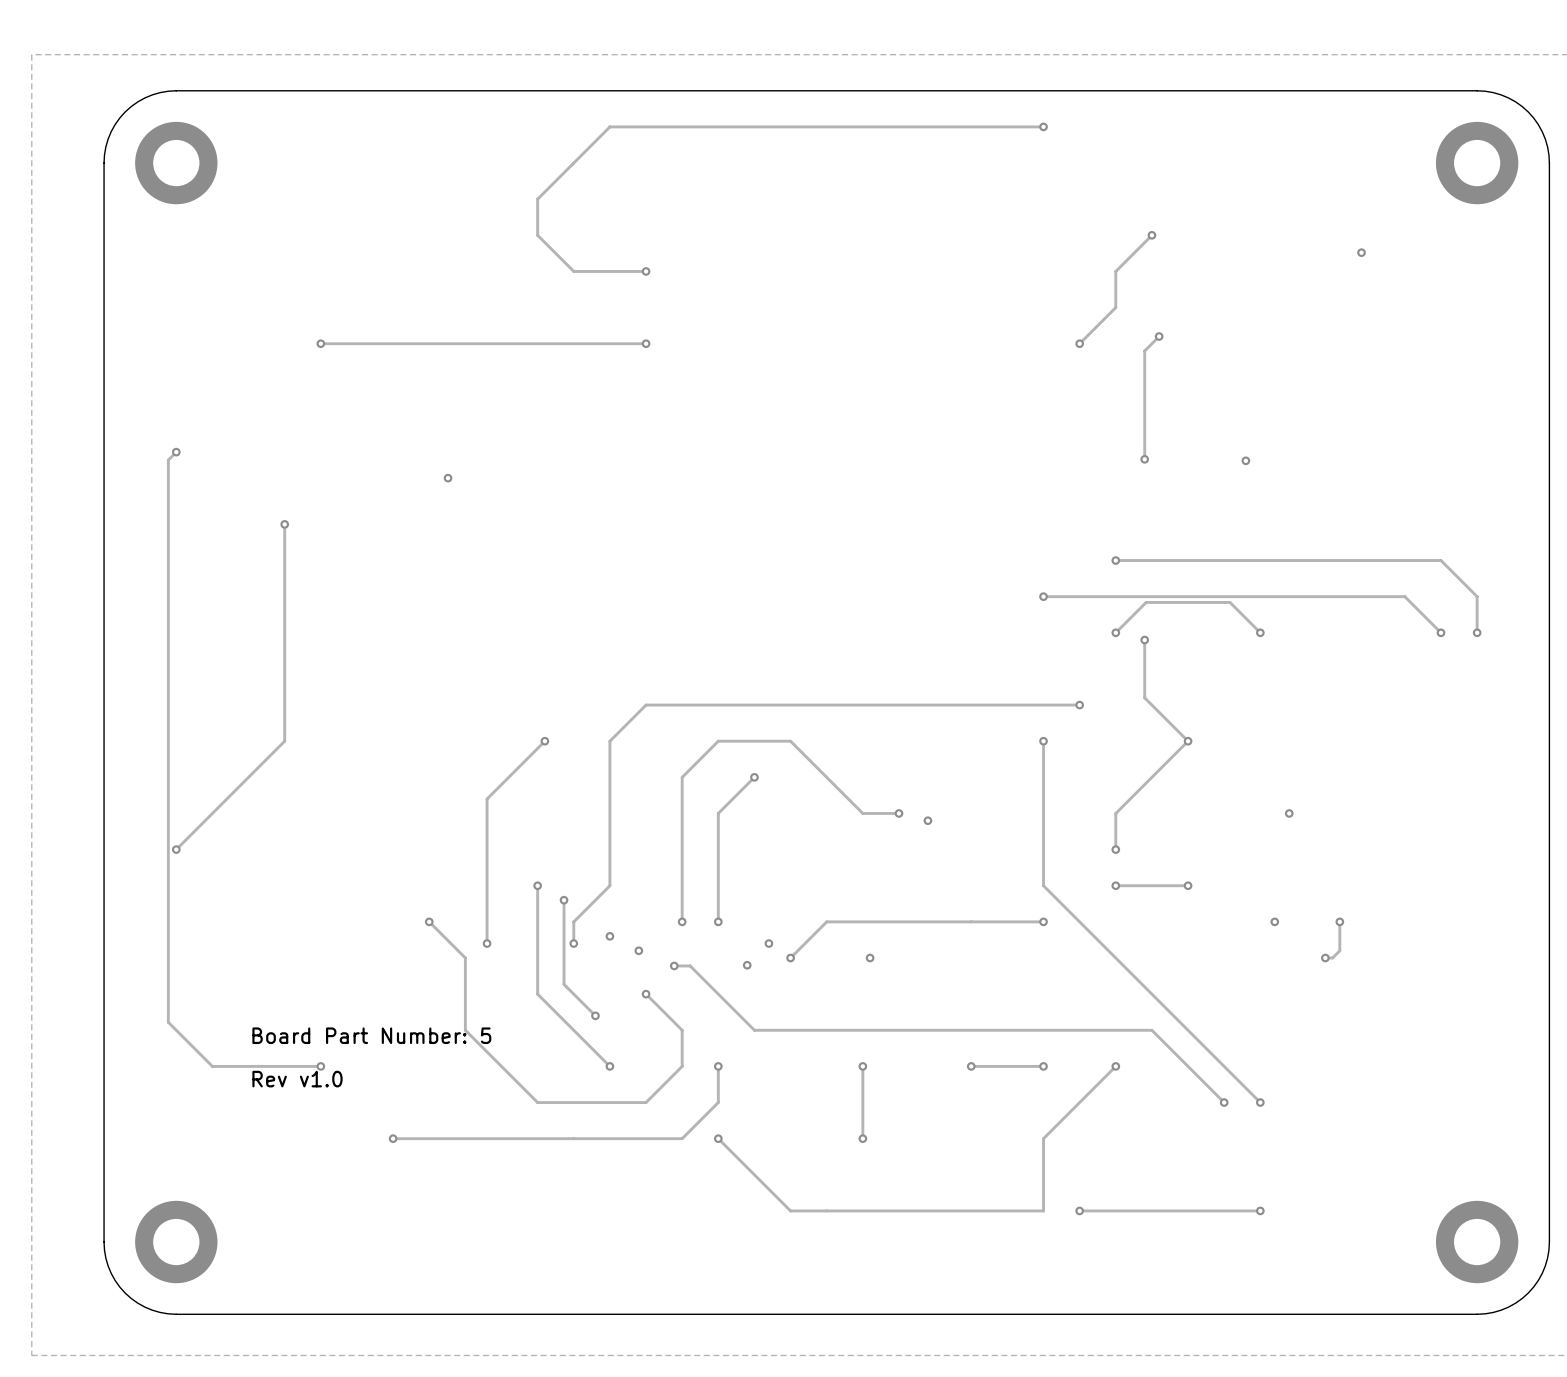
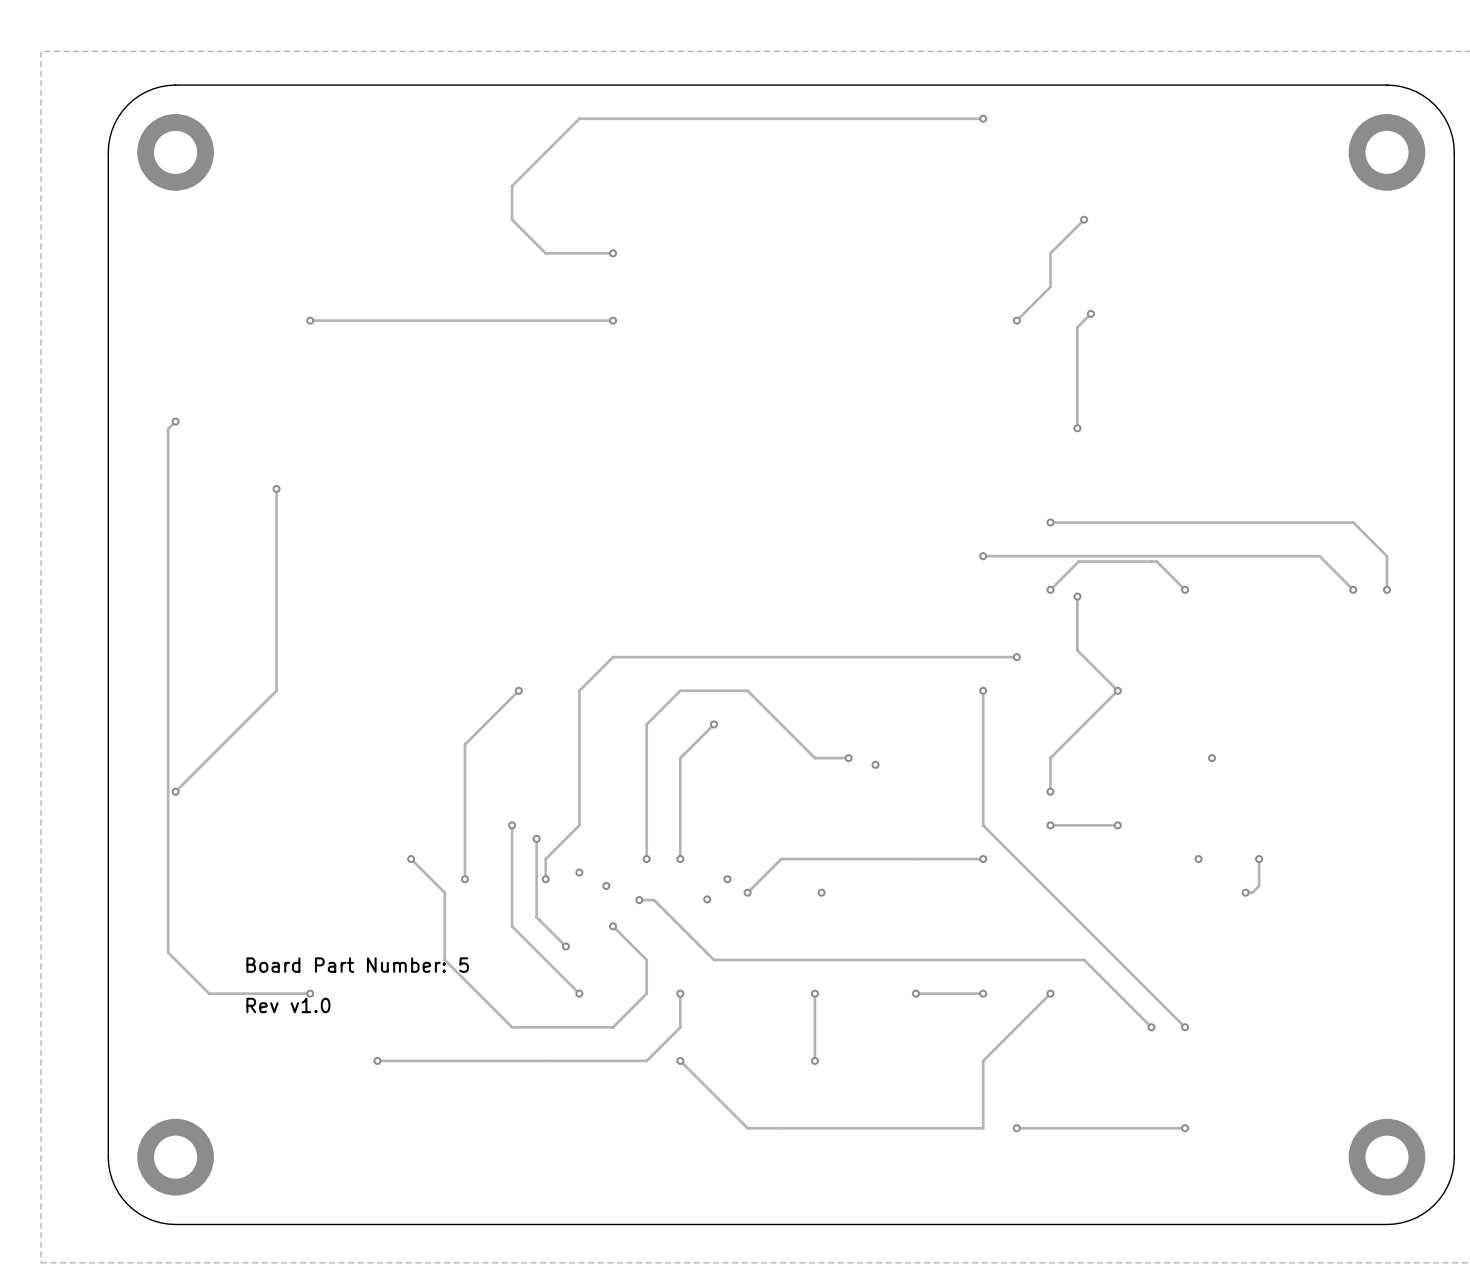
via: (1361, 252) -> none
via: (1245, 460) -> none
via: (448, 478) -> none

